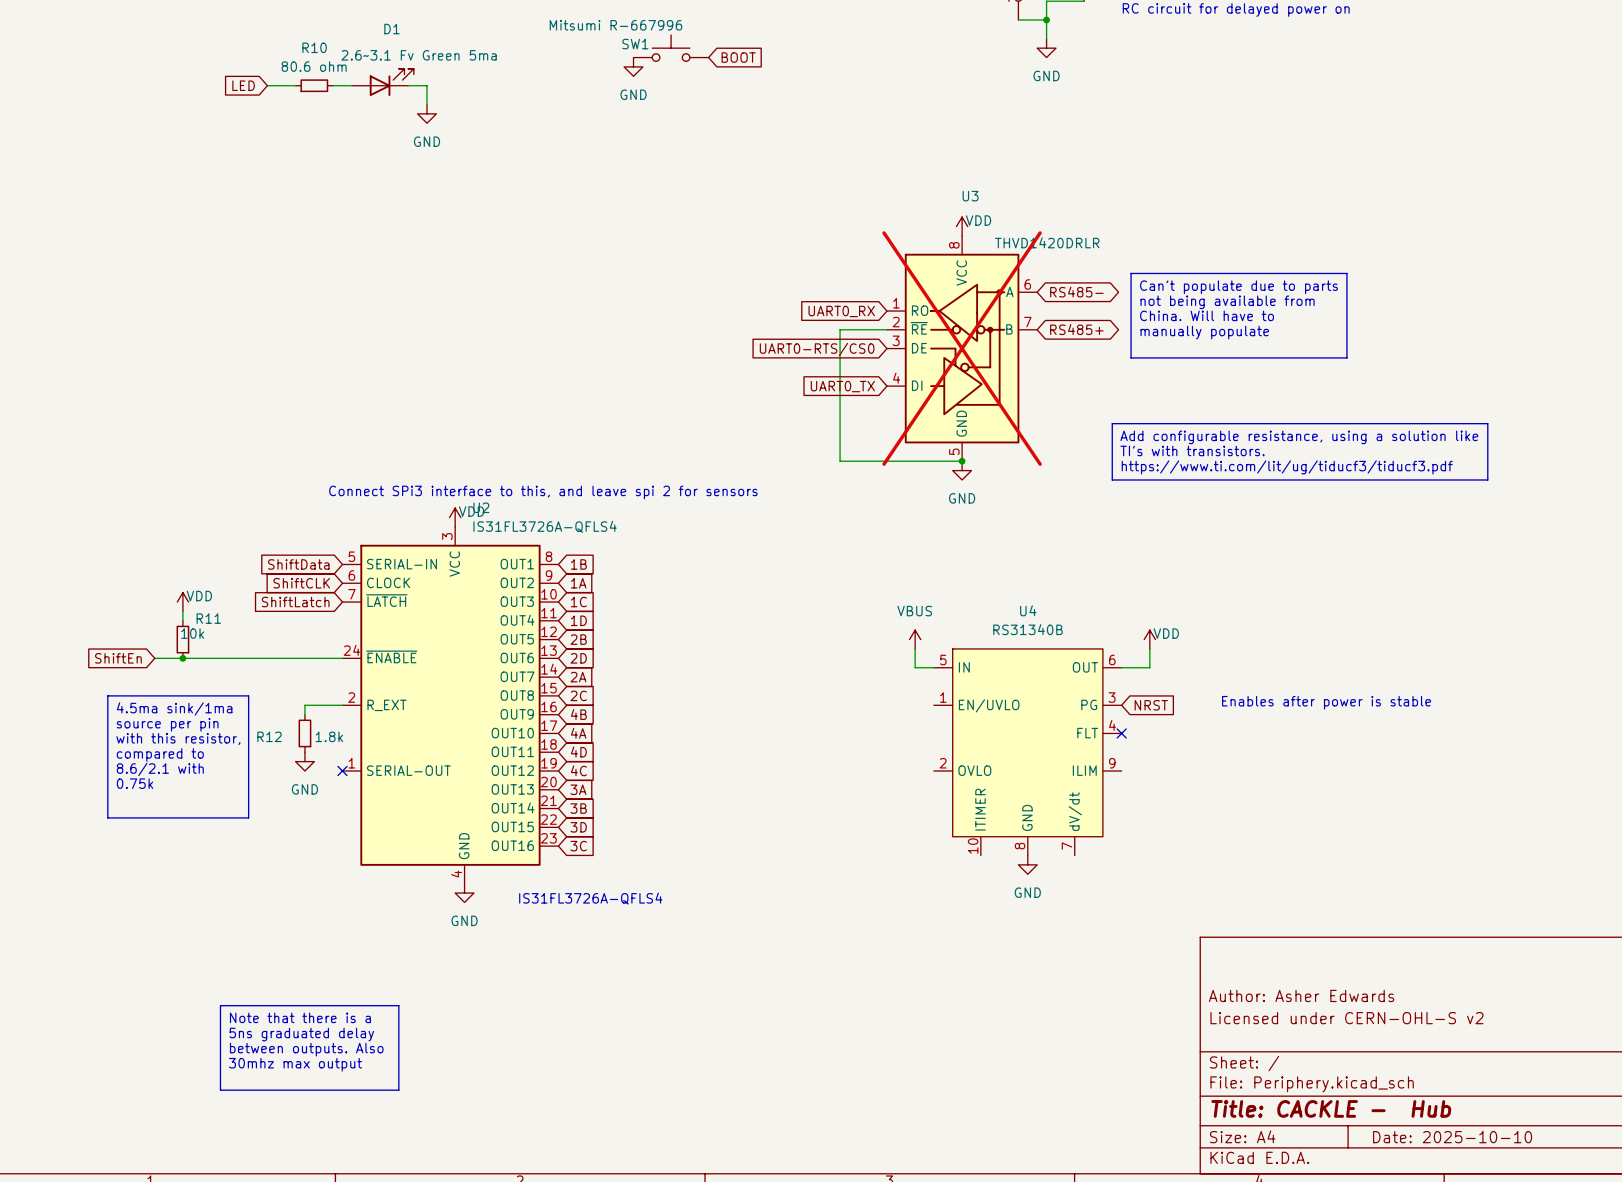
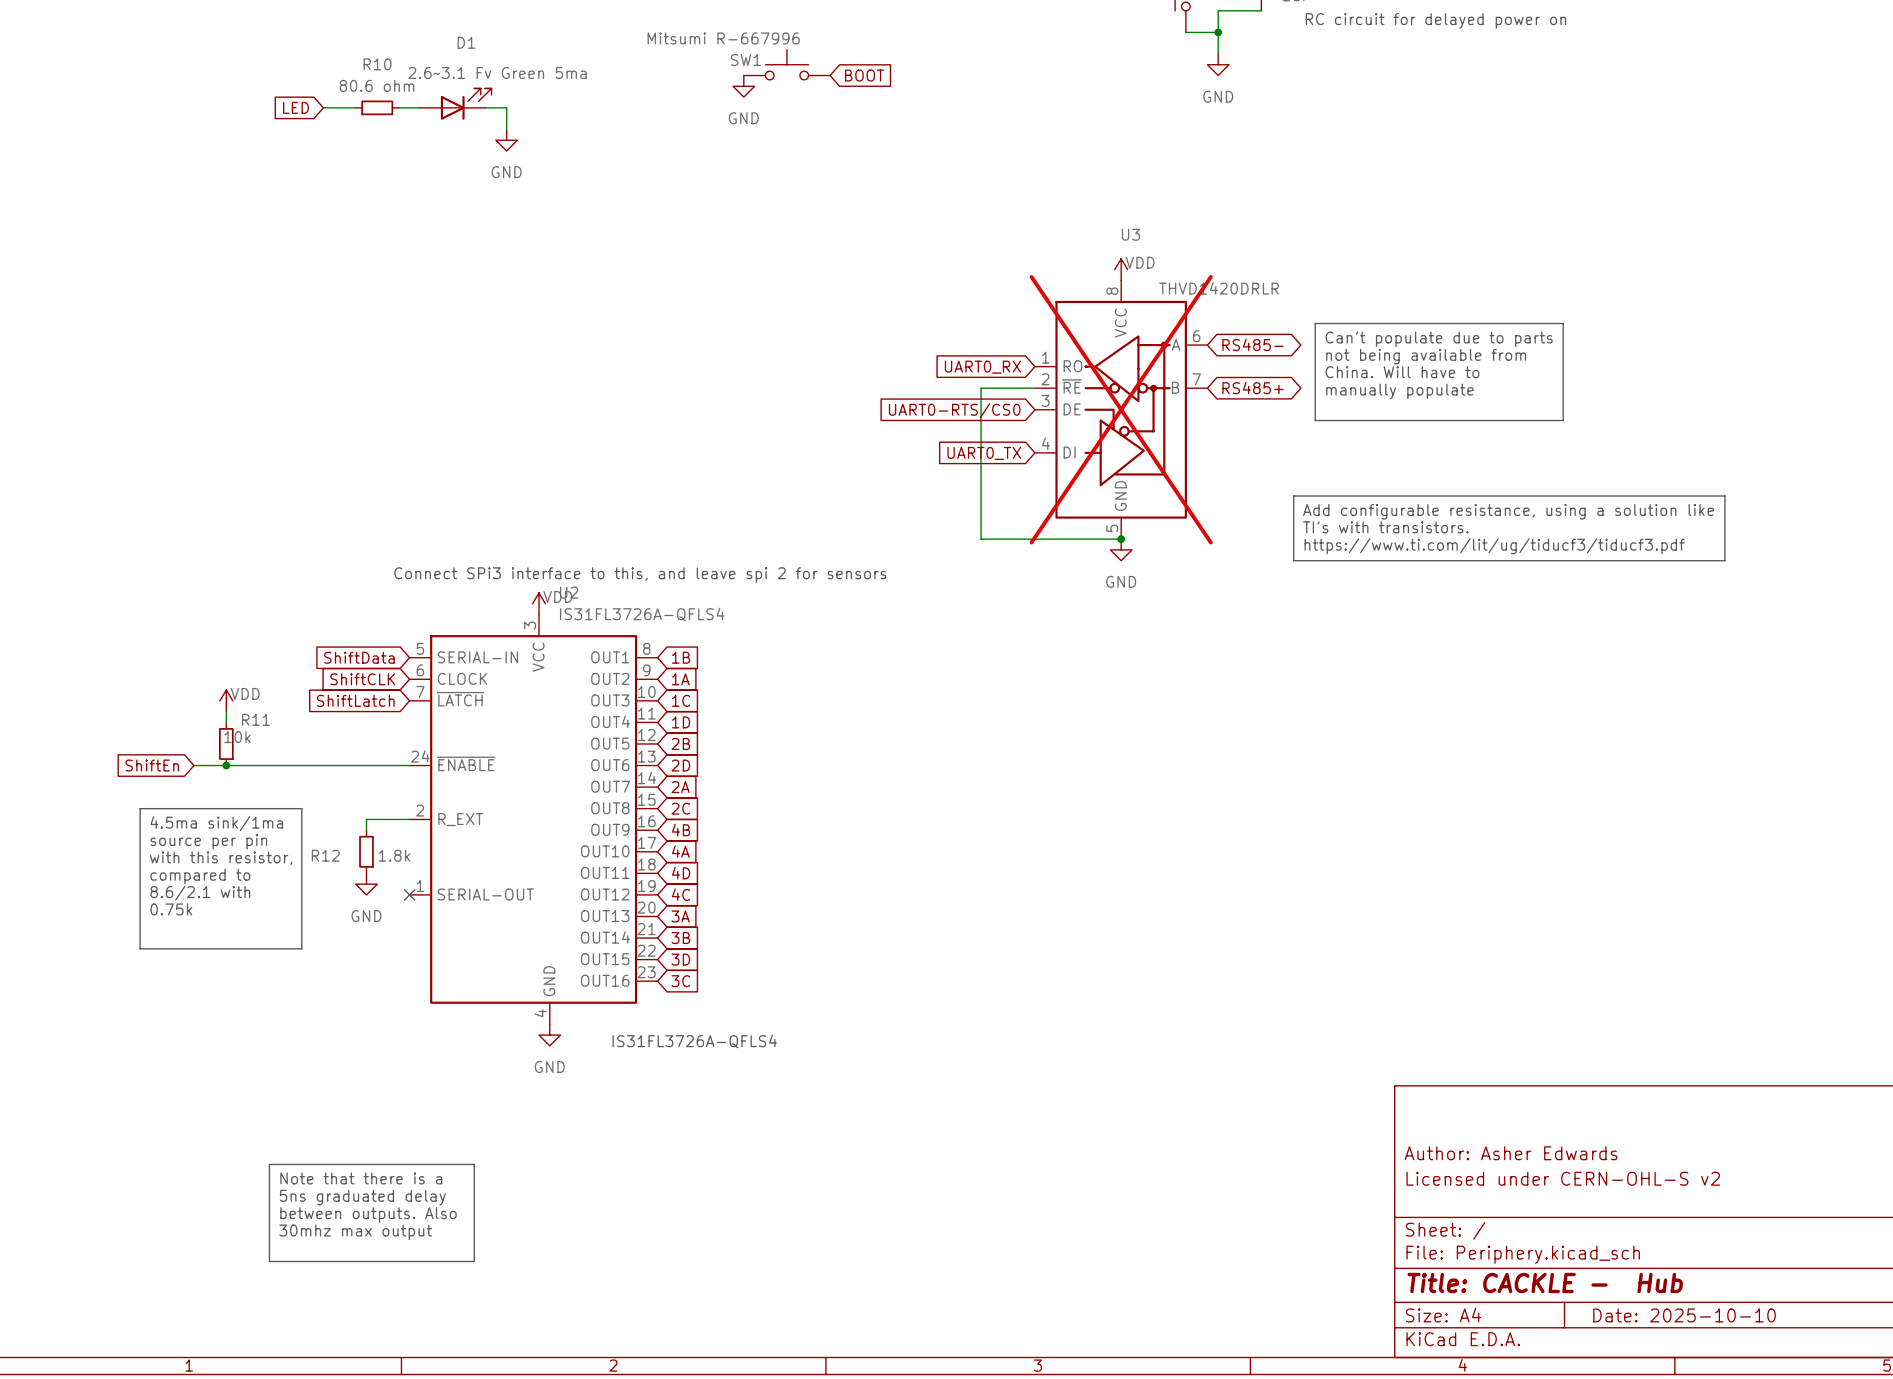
power symbol: VBUS (915, 639) -> none
power symbol: VDD (1149, 639) -> none
wire: (915, 648) (915, 667) (933, 667) -> none
wire: (1149, 648) (1149, 667) (1121, 667) -> none
text: Enables after power is stable (1326, 702) -> none
global label: NRST (1151, 705) -> none
no-connect mark: (1121, 733) -> none
U4: RS31340B (1027, 752) -> none
power symbol: GND (1027, 864) -> none

